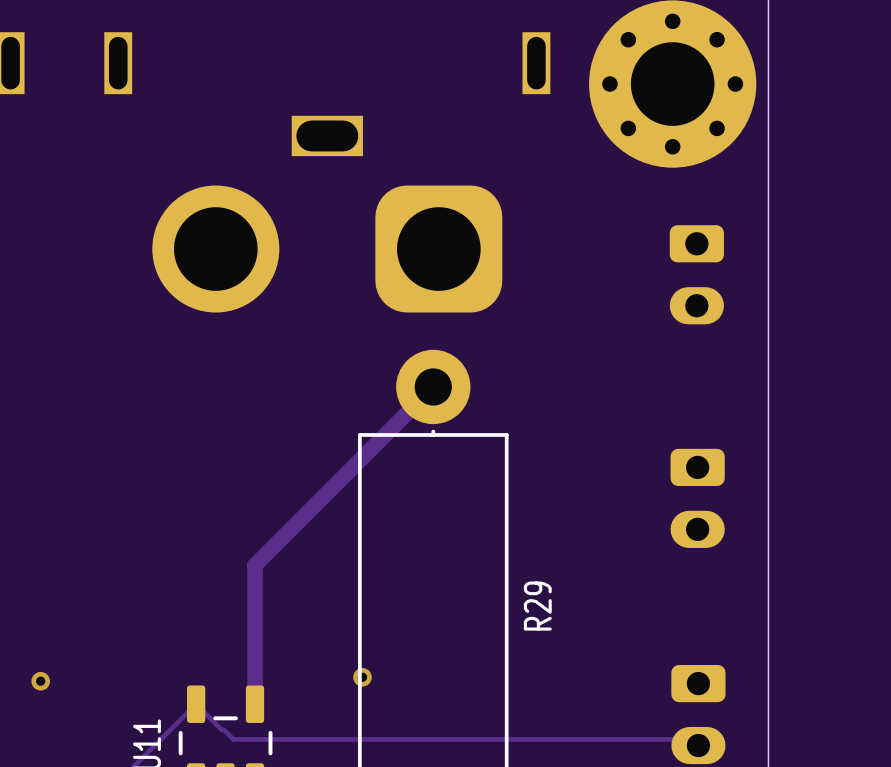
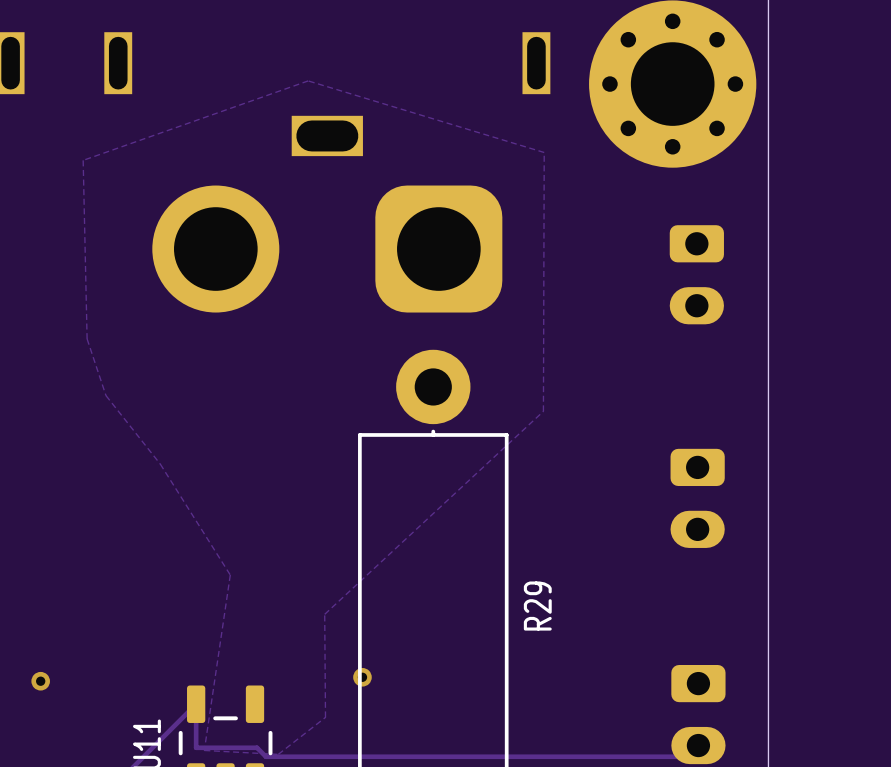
zone outline: none -> (308, 80) (544, 152) (543, 411) (324, 614) (325, 717) (278, 754) (204, 750) (230, 575) (160, 464) (105, 395) (87, 338) (83, 160) (308, 80)
track: (433, 386) (255, 565) (255, 704) -> none
track: (196, 704) (233, 739) (692, 739) (698, 745) -> (196, 704) (196, 747) (257, 747) (265, 756) (687, 756) (698, 745)

